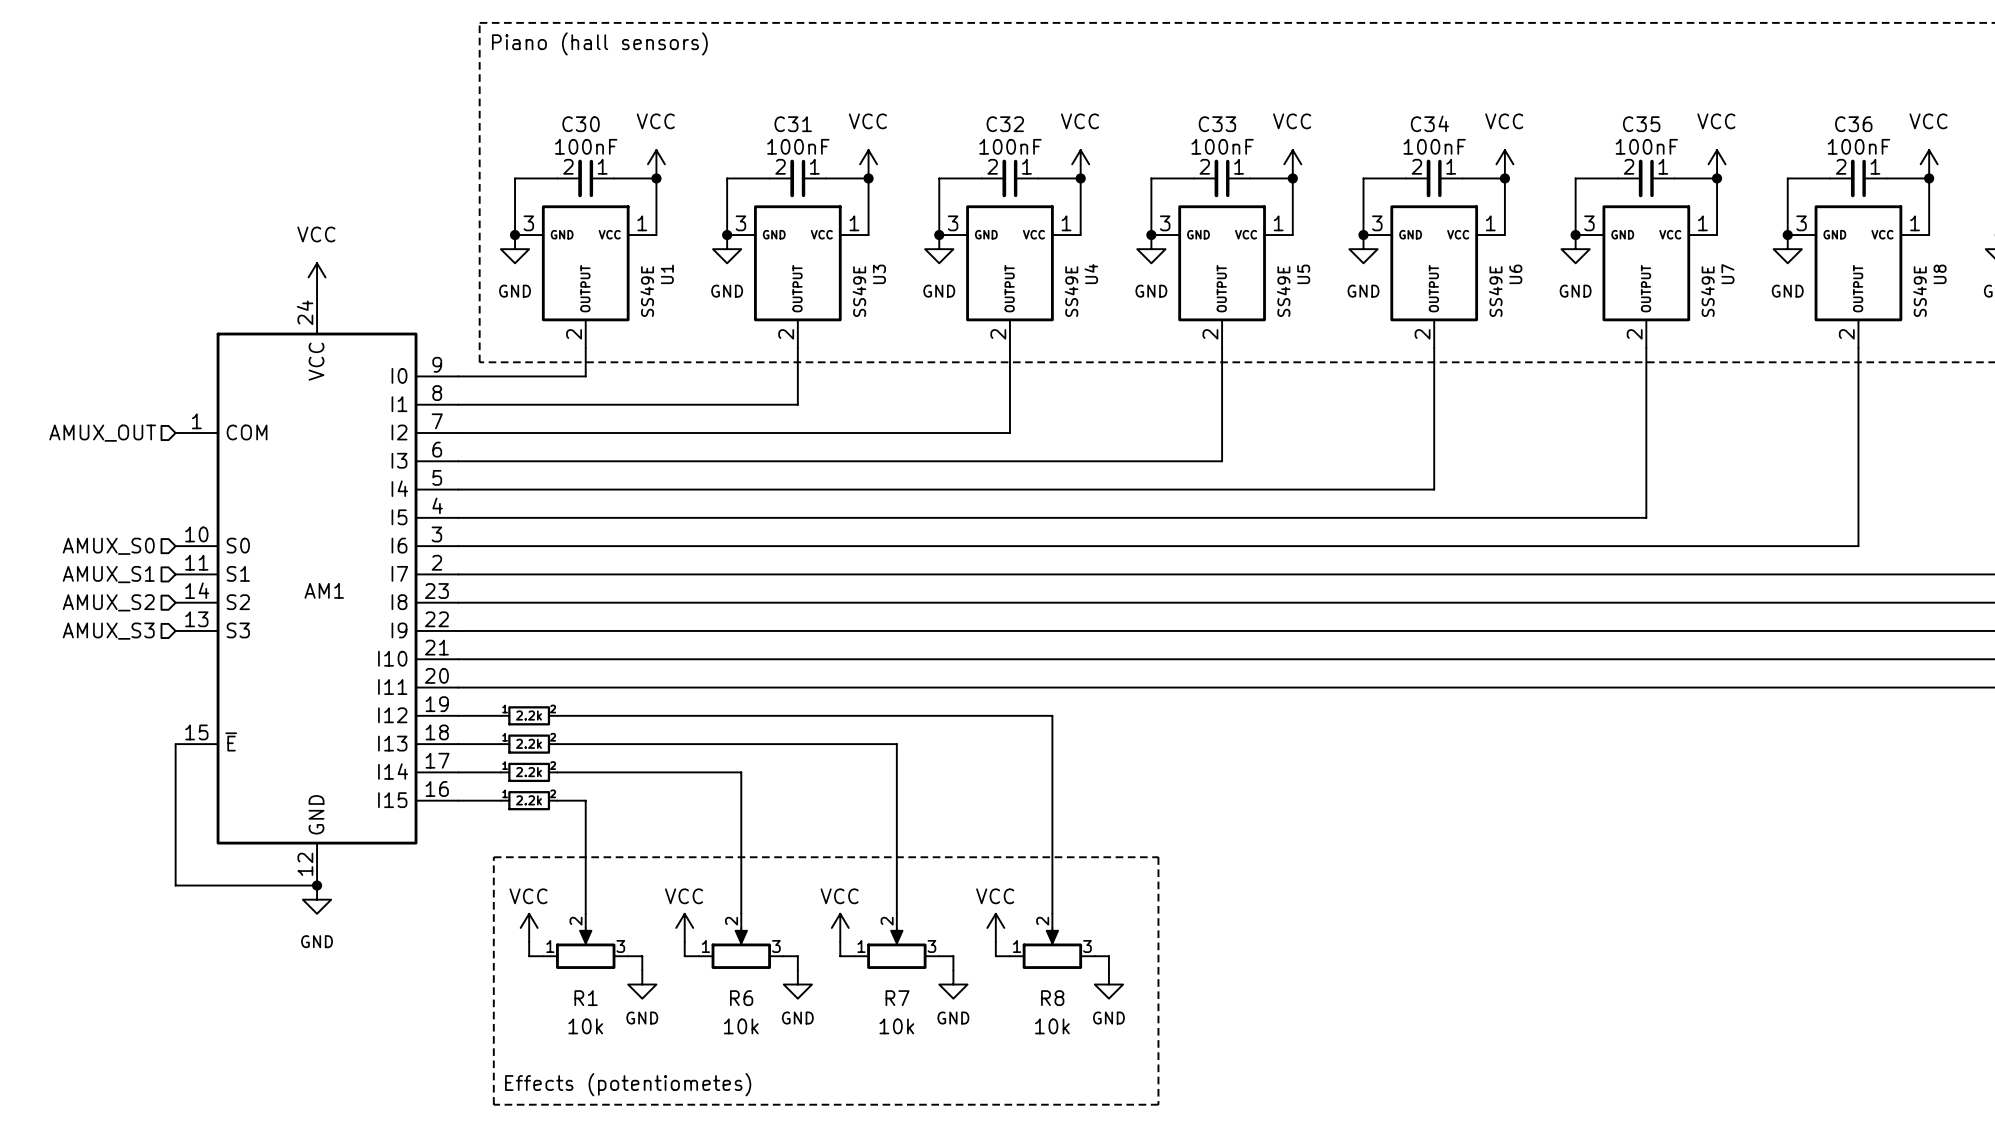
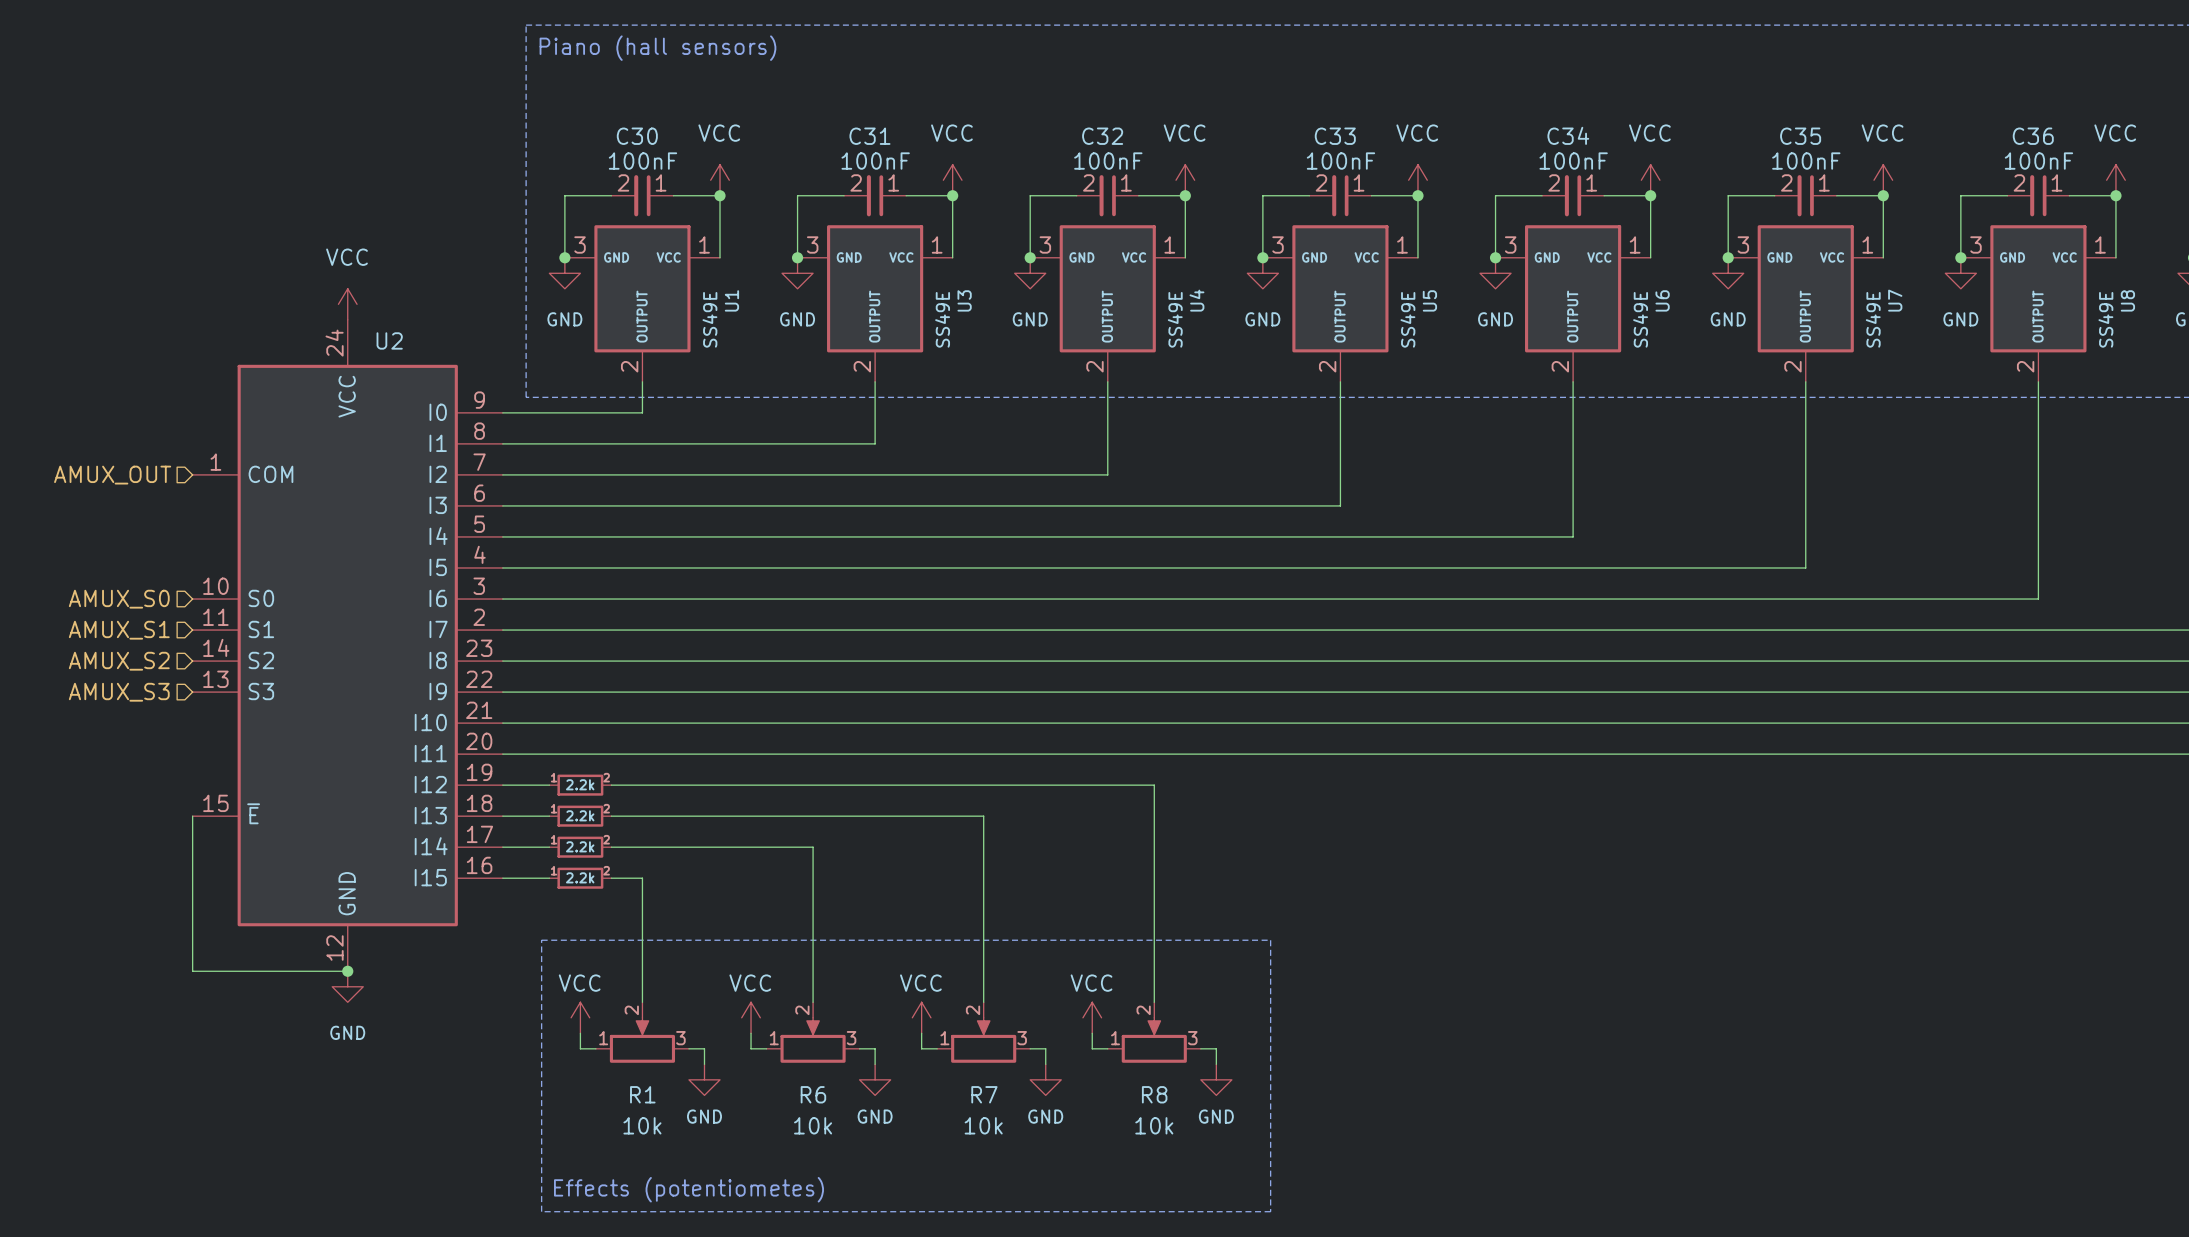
AM1 name: AM1 (324, 590) -> U2 (389, 340)

